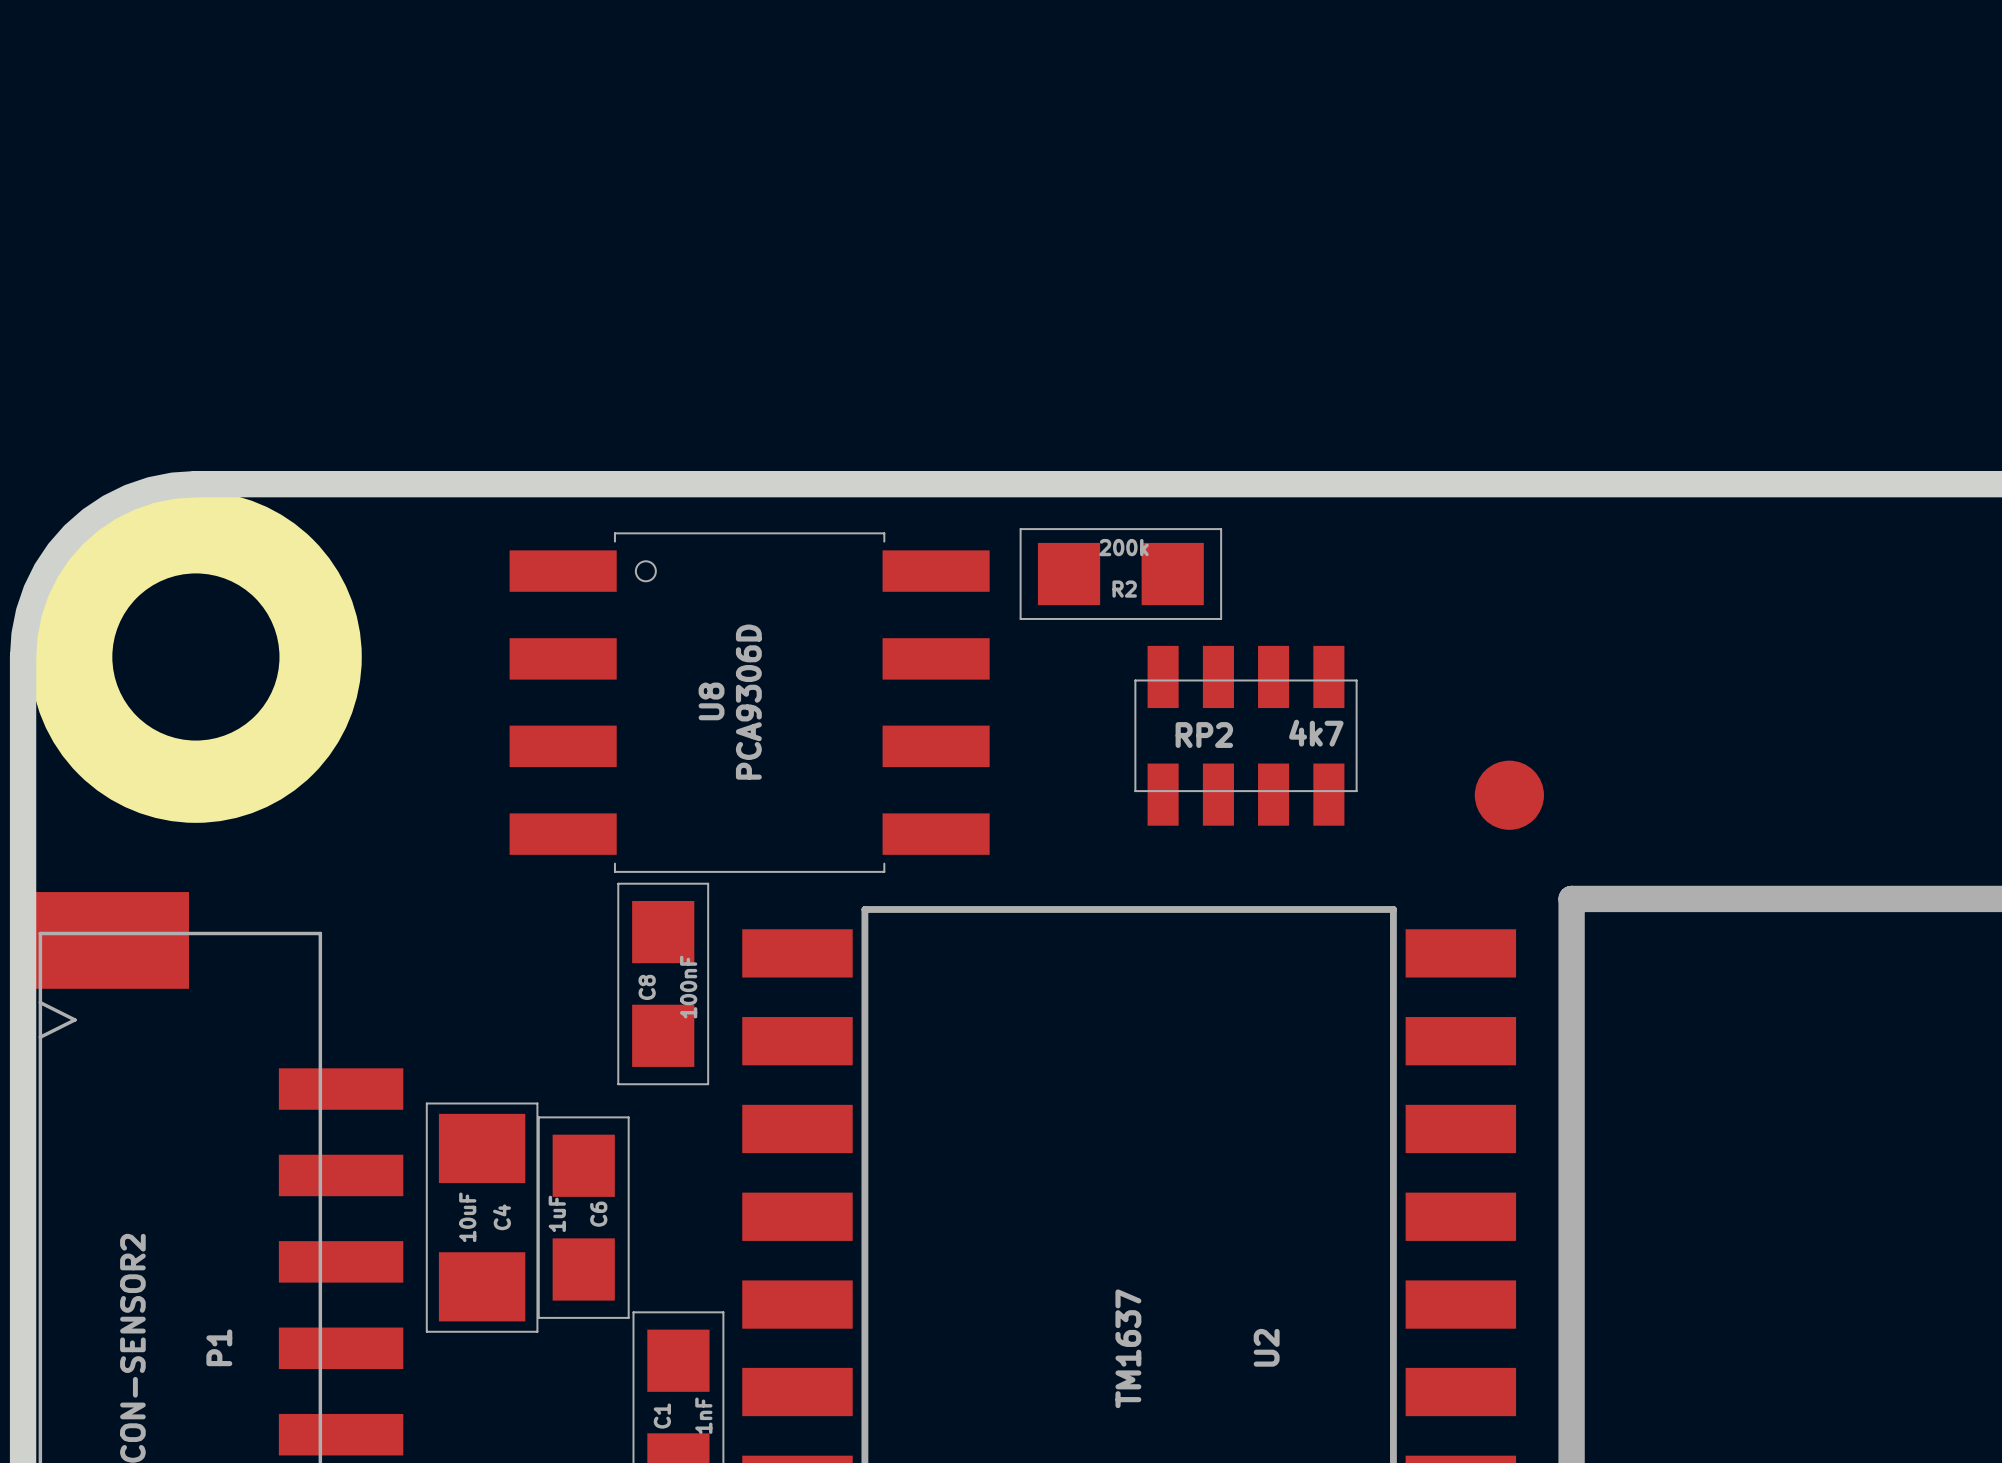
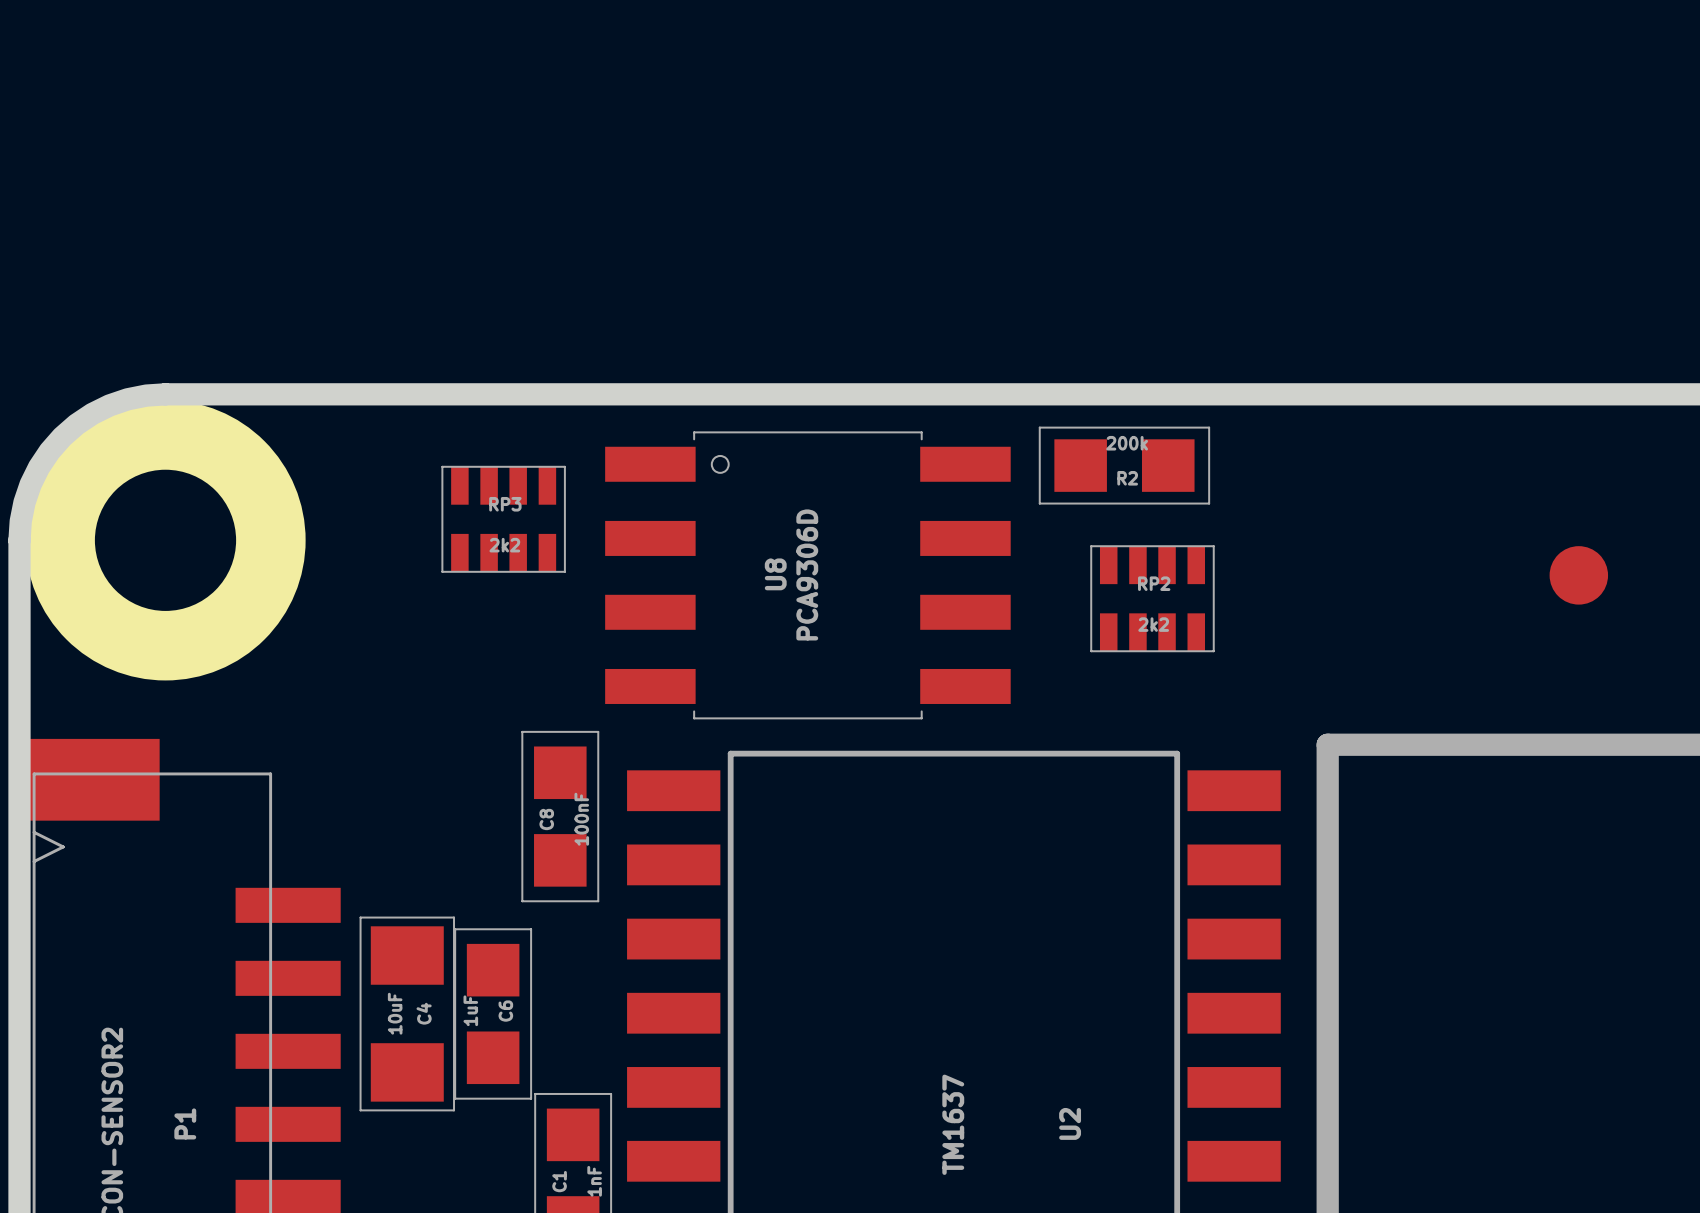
R2 position: (1120, 574) -> (1124, 465)
RP3: none -> 2k2 (503, 519)
RP2 footprint: [1135, 645, 1357, 826] -> [1091, 546, 1214, 652]
U8 position: (749, 702) -> (807, 575)
RP2 value: 4k7 (1316, 733) -> 2k2 (1153, 624)
part position: (1509, 795) -> (1578, 575)

